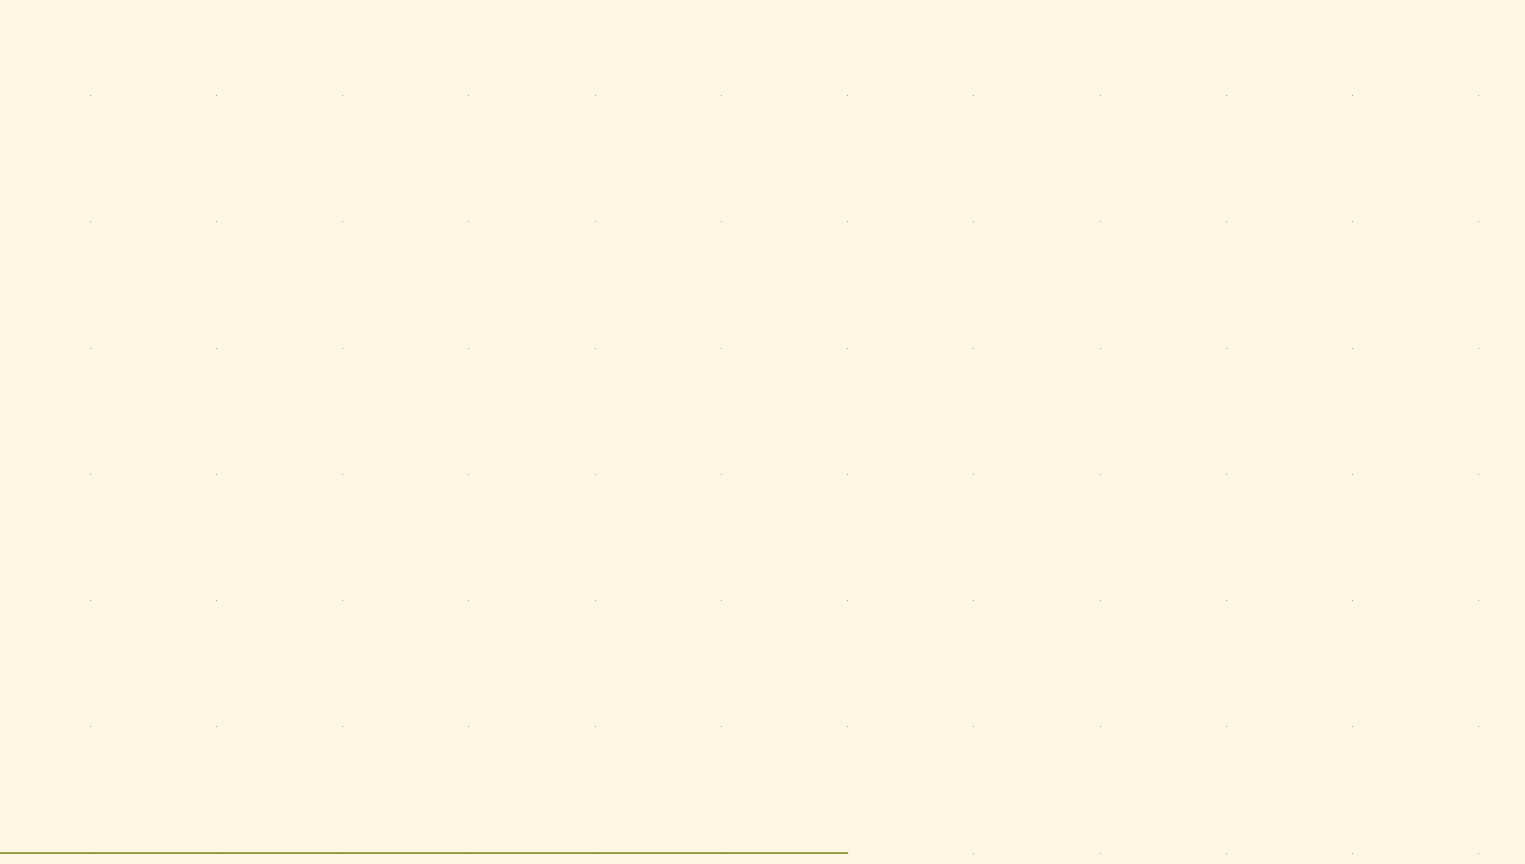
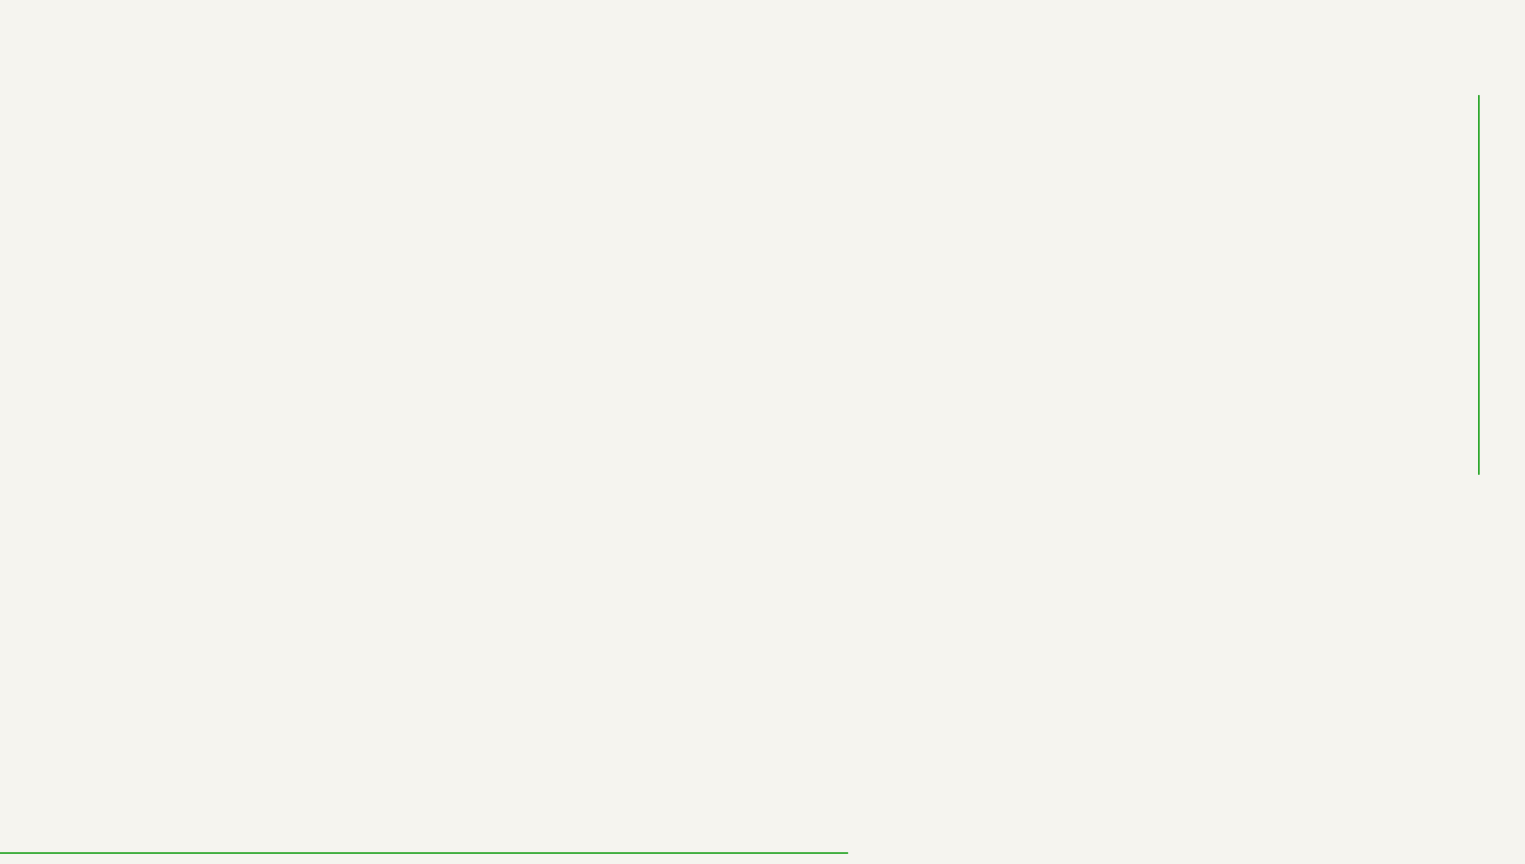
wire: none -> (1478, 95) (1478, 474)

